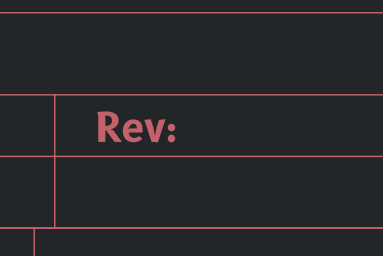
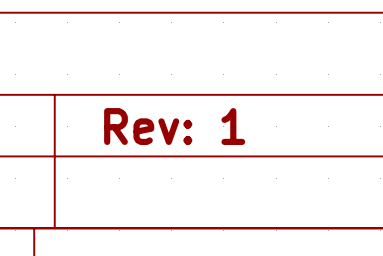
title block: Rev: (136, 126) -> Rev: 1 (174, 126)

